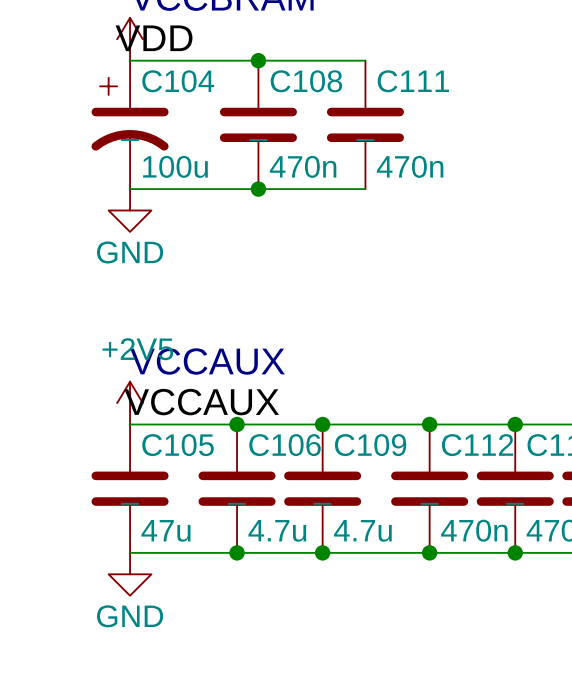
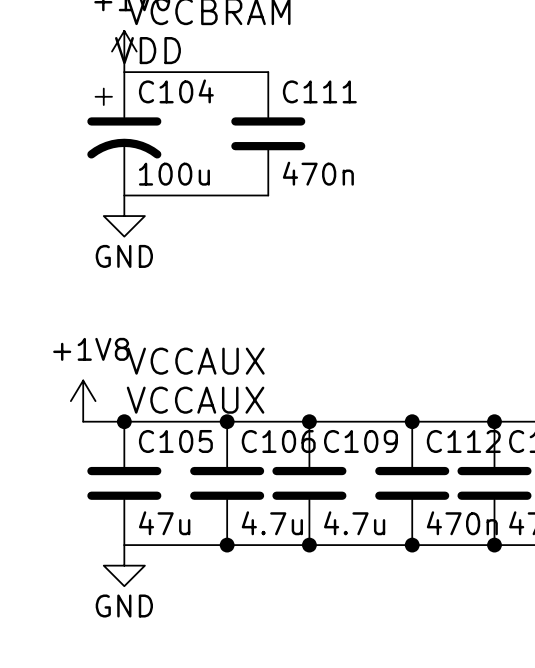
junction: (258, 60) -> none
wire: (279, 60) (365, 60) -> none
C108: 470n (258, 124) -> none
C111 position: (365, 124) -> (268, 133)
junction: (258, 189) -> none
wire: (279, 189) (365, 189) -> none
power symbol: none -> +1V8 (83, 401)
power symbol: +2V5 (130, 403) -> none
wire: none -> (83, 421) (124, 421)
junction: none -> (124, 421)

